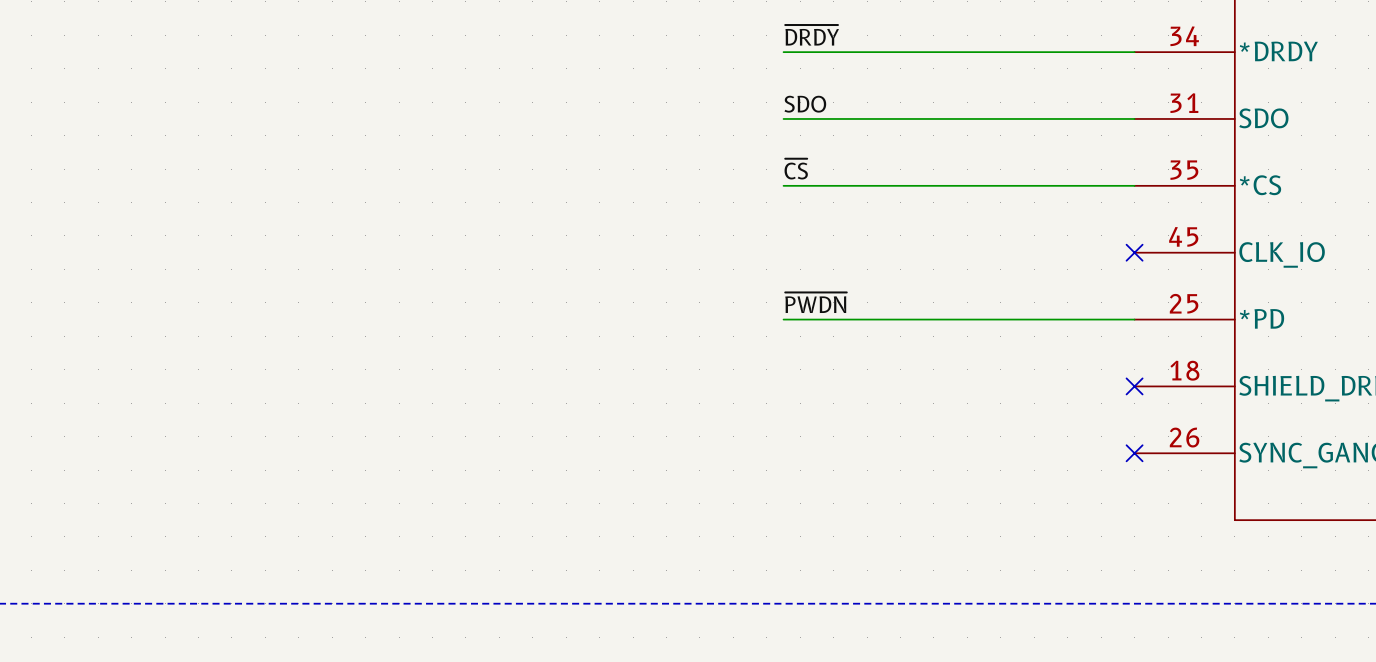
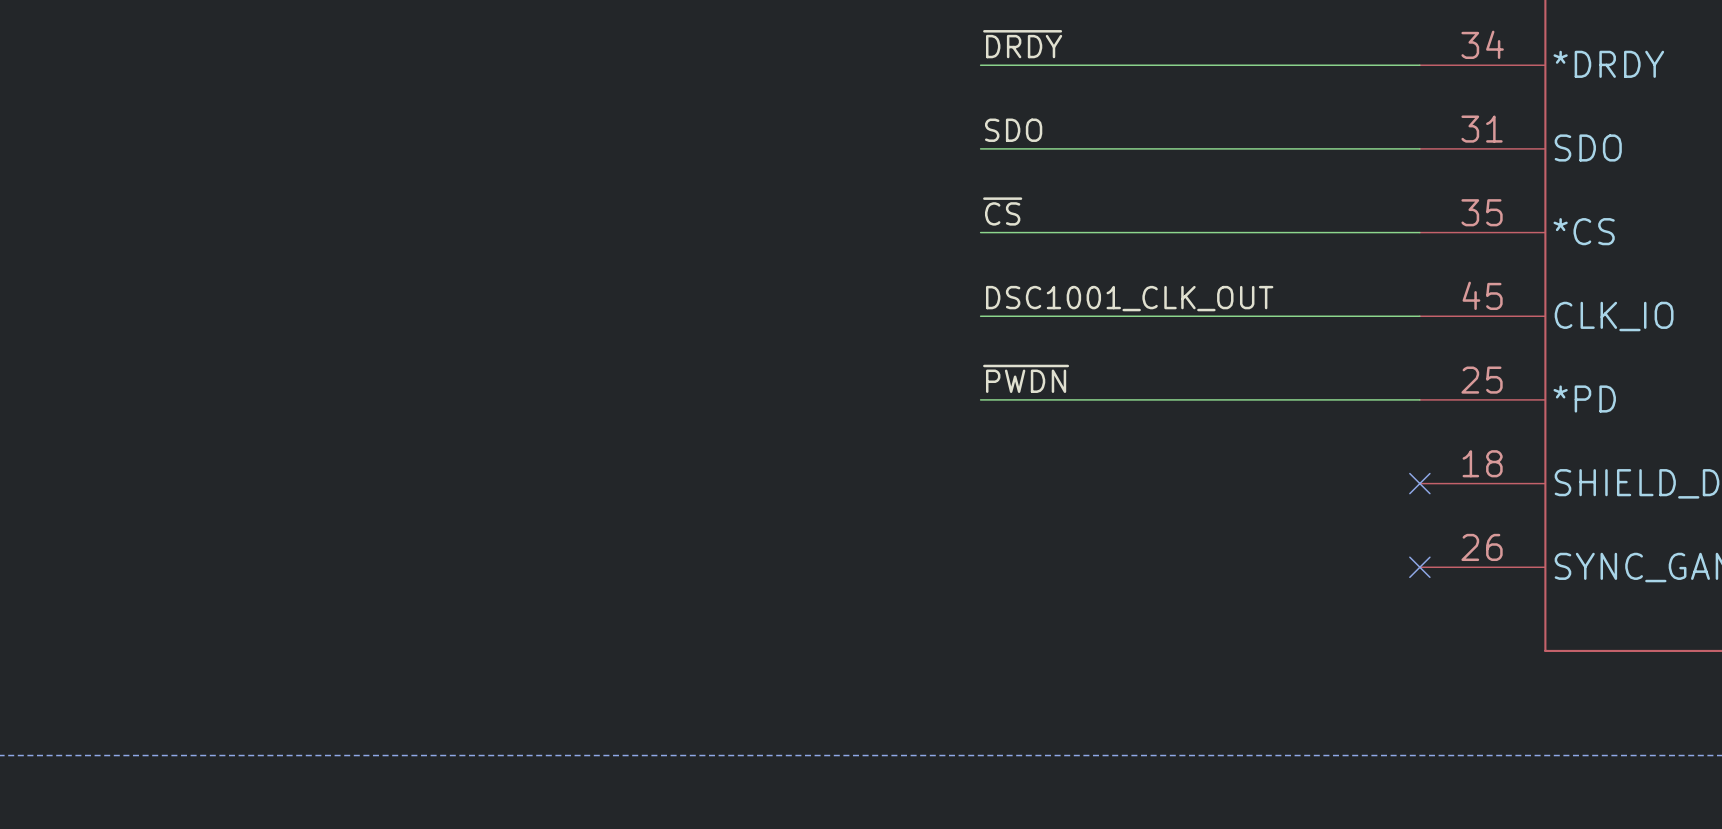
label: none -> DSC1001_CLK_OUT (1129, 298)
wire: none -> (980, 316) (1419, 316)
no-connect mark: (1134, 252) -> none

